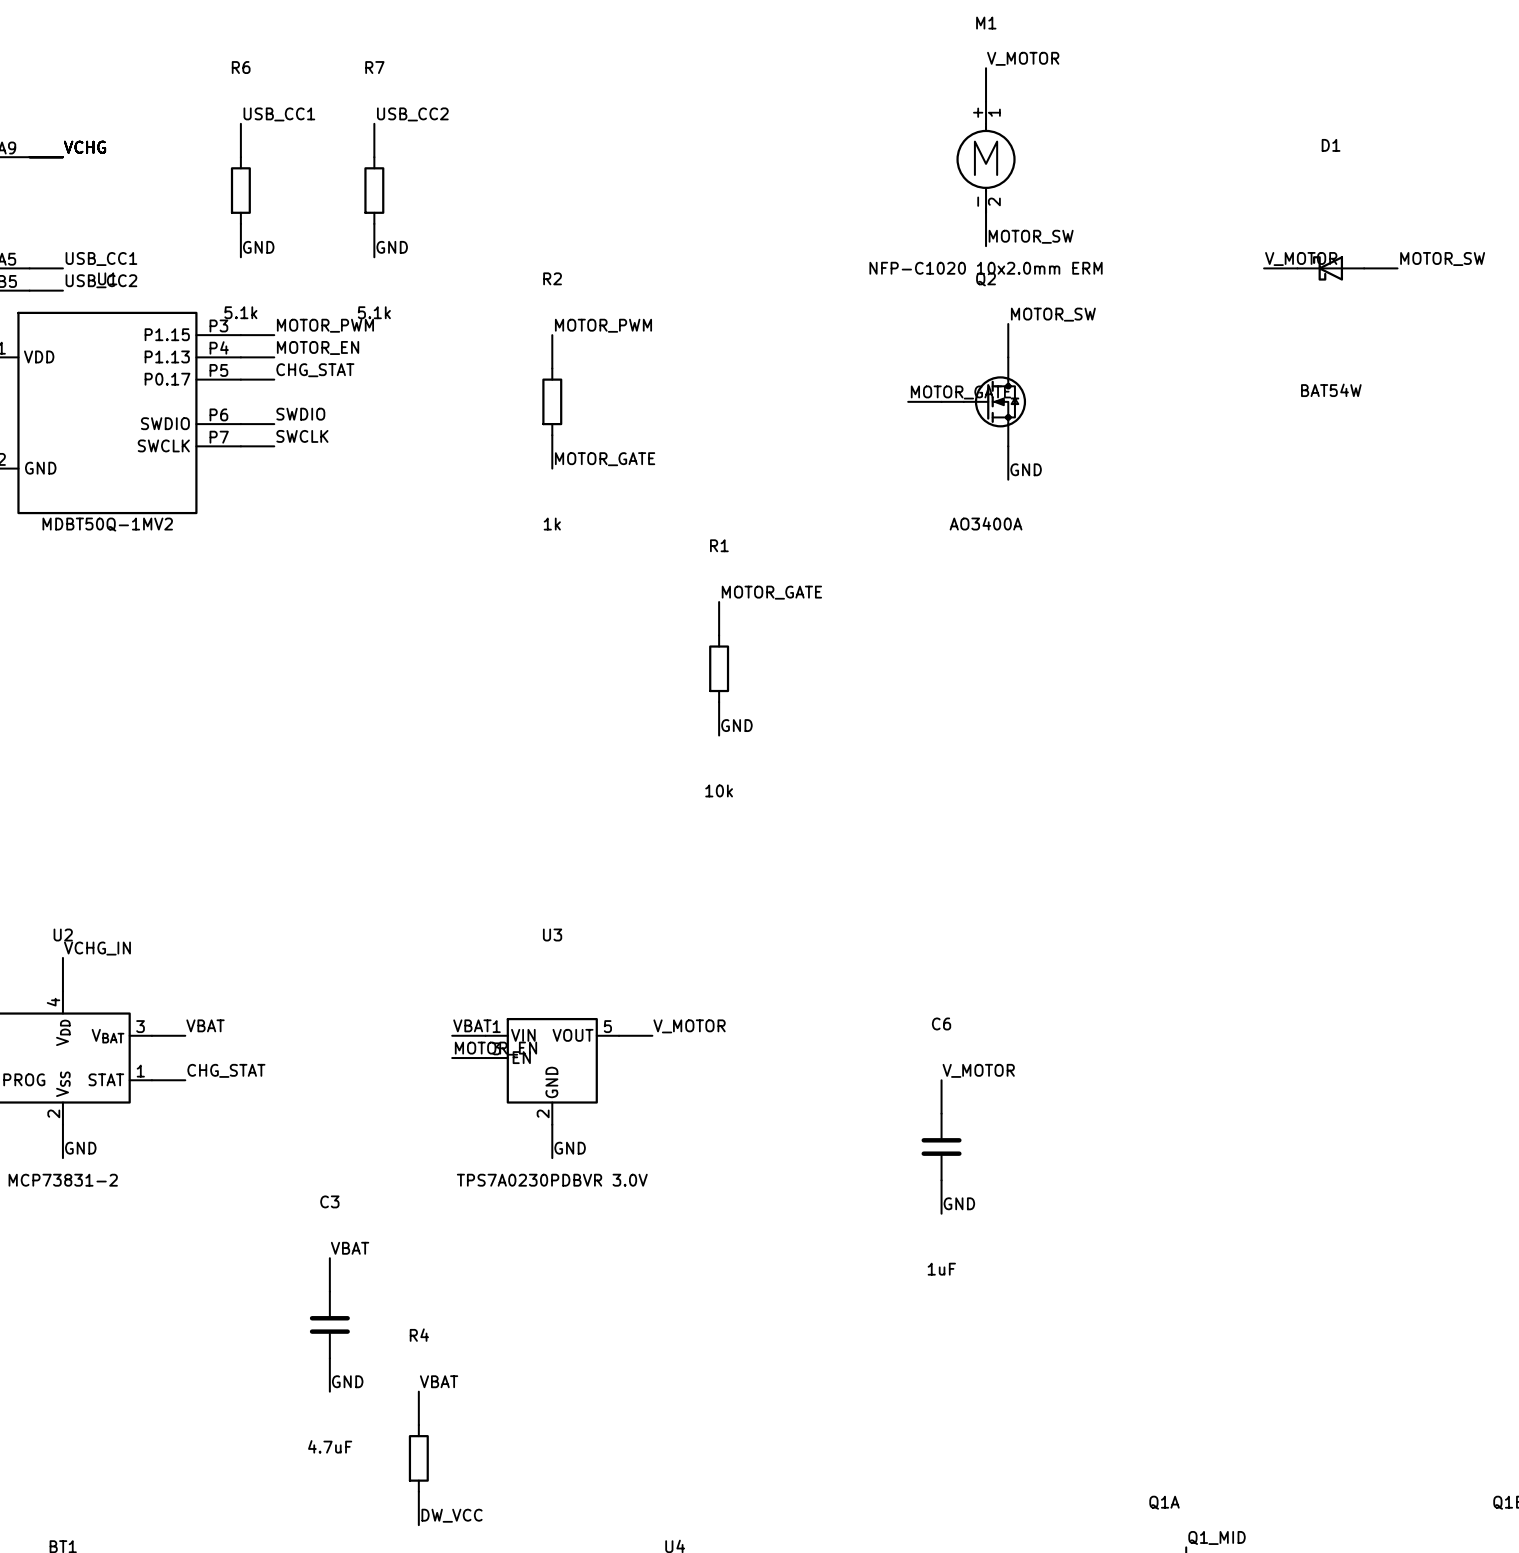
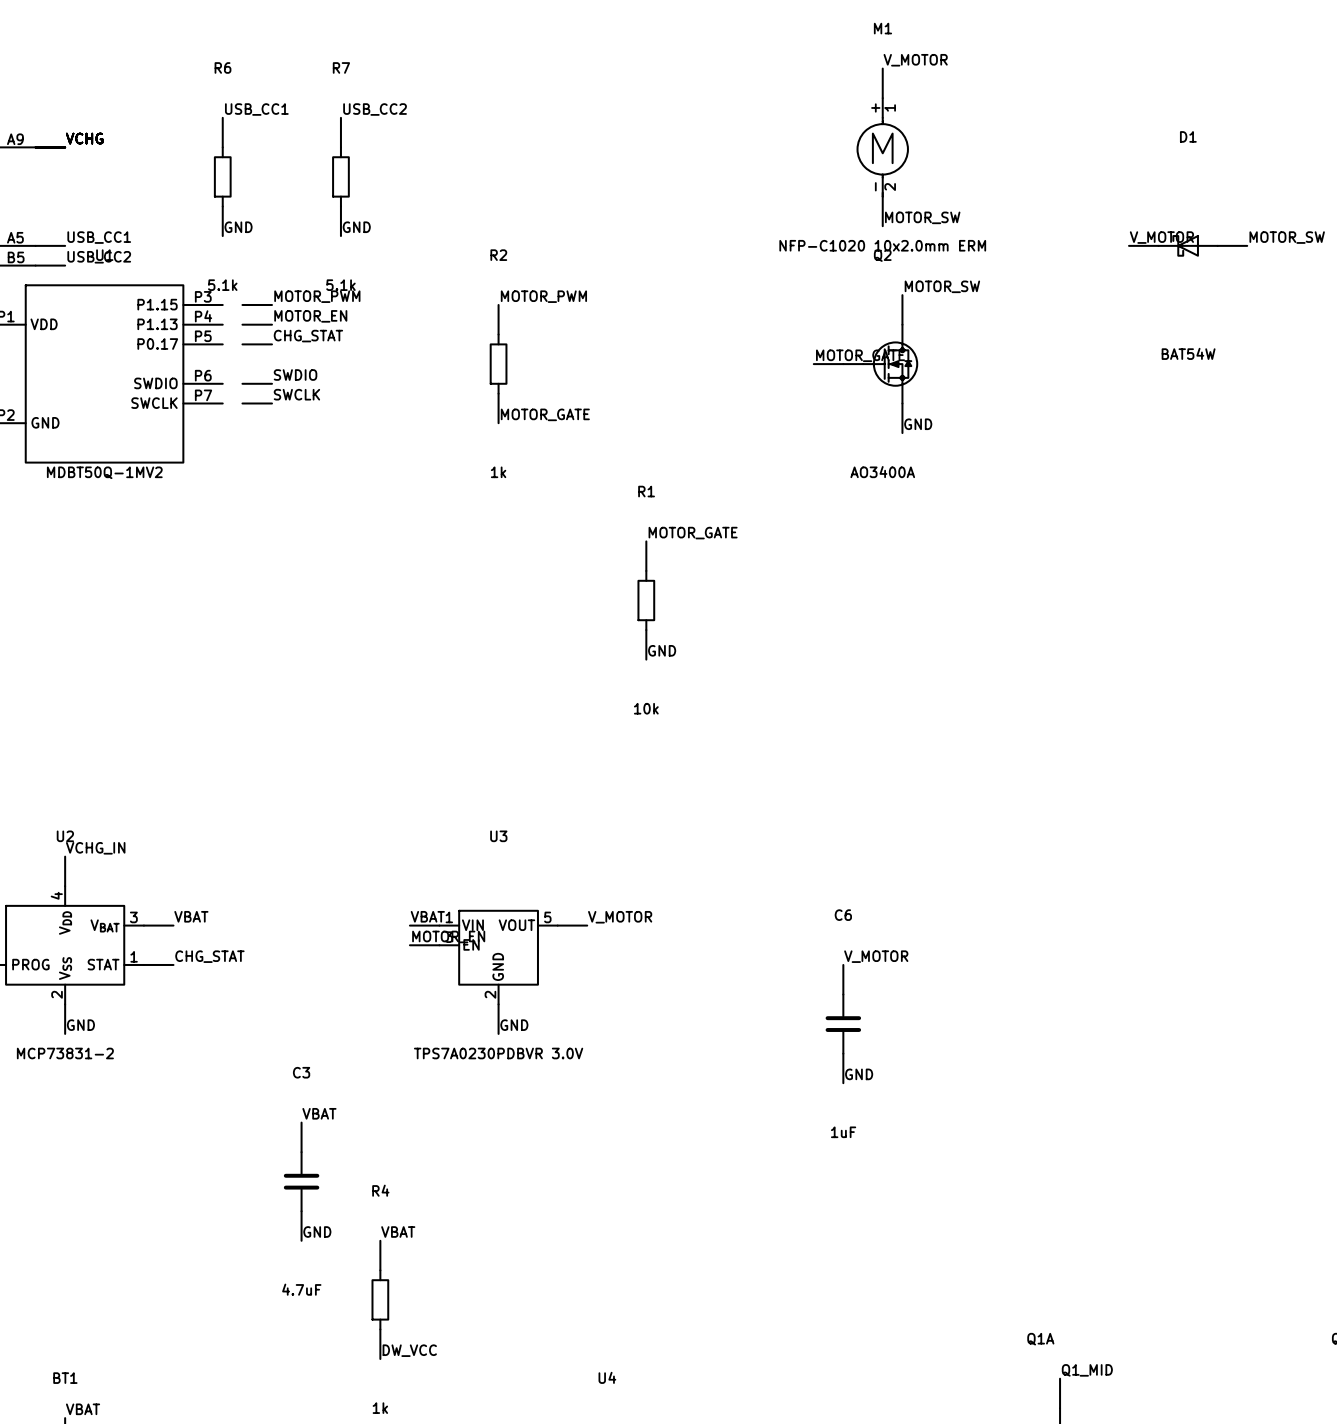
label position: MOTOR_PWM (325, 325) -> MOTOR_PWM (317, 296)
wire: (240, 335) (263, 335) -> (252, 304) (272, 304)
label position: MOTOR_EN (318, 347) -> MOTOR_EN (310, 316)
wire: (240, 357) (263, 357) -> (252, 324) (272, 324)
label position: CHG_STAT (315, 370) -> CHG_STAT (308, 336)
wire: (240, 379) (263, 379) -> (252, 344) (272, 344)
label position: SWDIO (300, 414) -> SWDIO (295, 375)
wire: (240, 424) (263, 424) -> (252, 383) (272, 383)
label position: SWCLK (302, 436) -> SWCLK (296, 394)
wire: (240, 446) (263, 446) -> (252, 403) (272, 403)

